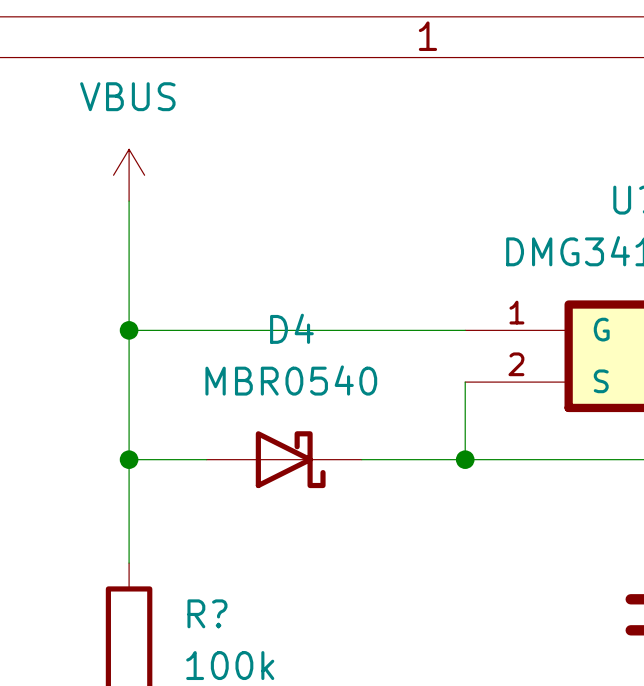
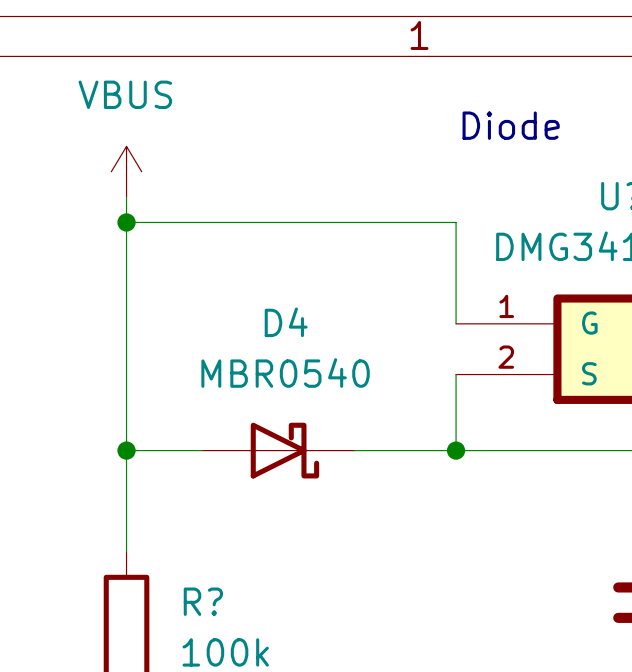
text: none -> Diode (511, 125)
wire: (129, 330) (465, 330) -> (126, 222) (456, 222) (456, 323)
junction position: (129, 330) -> (126, 222)

